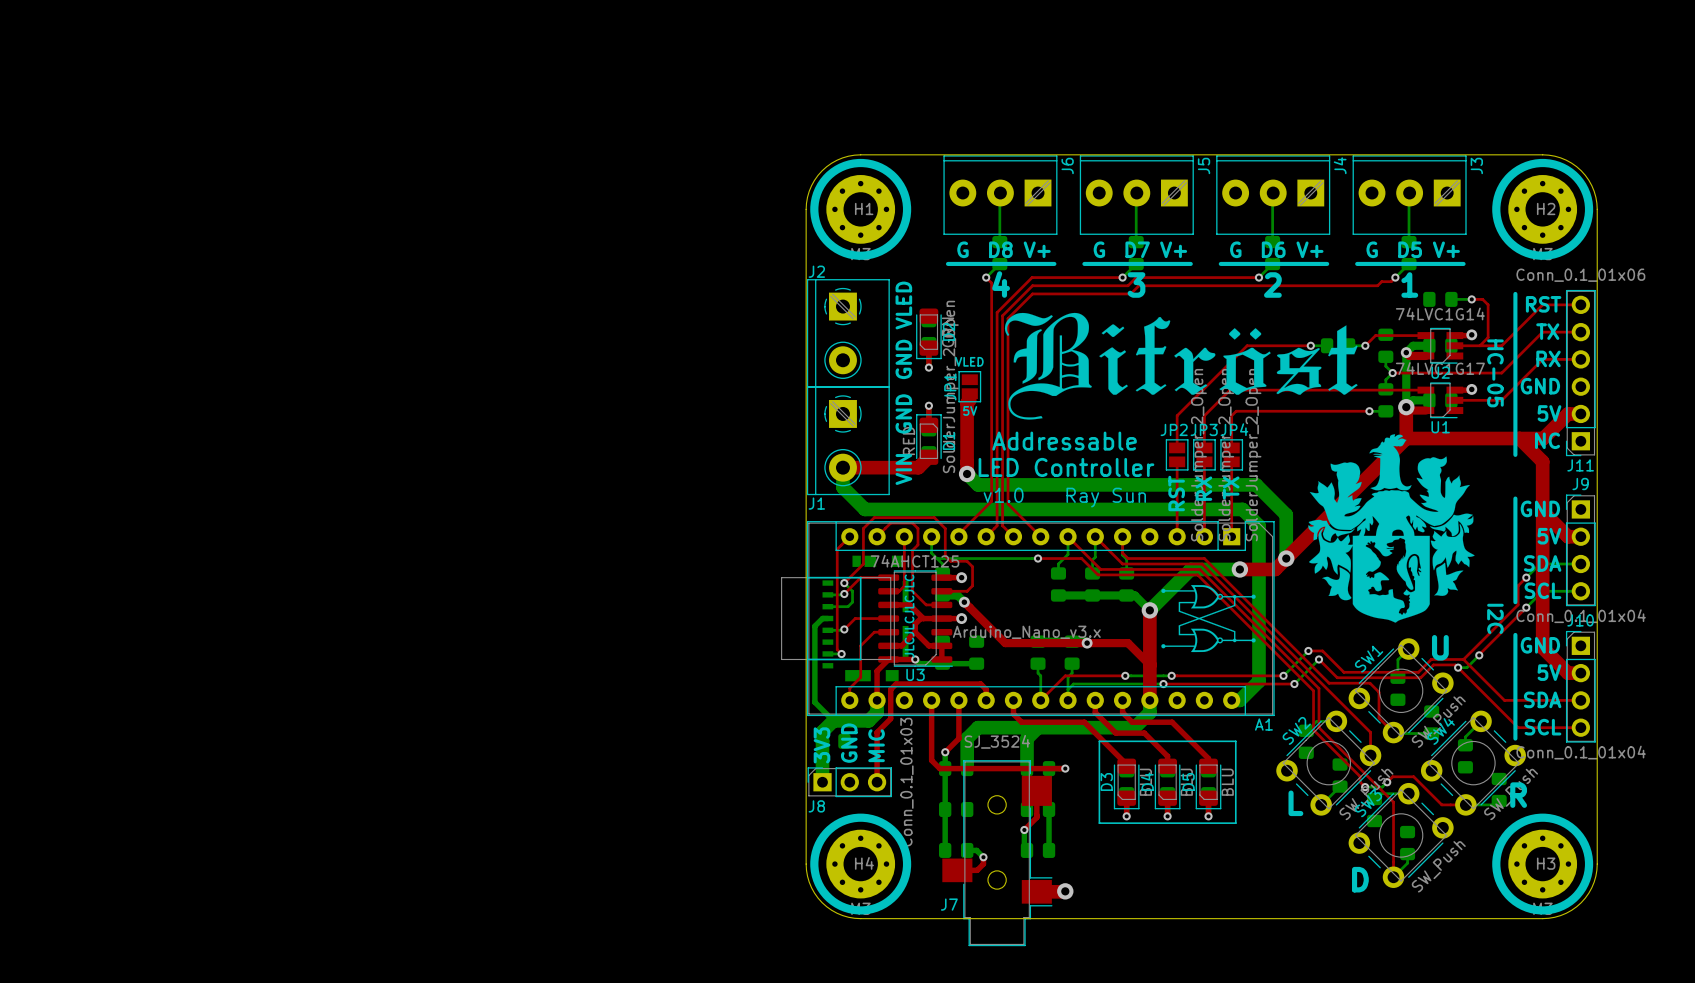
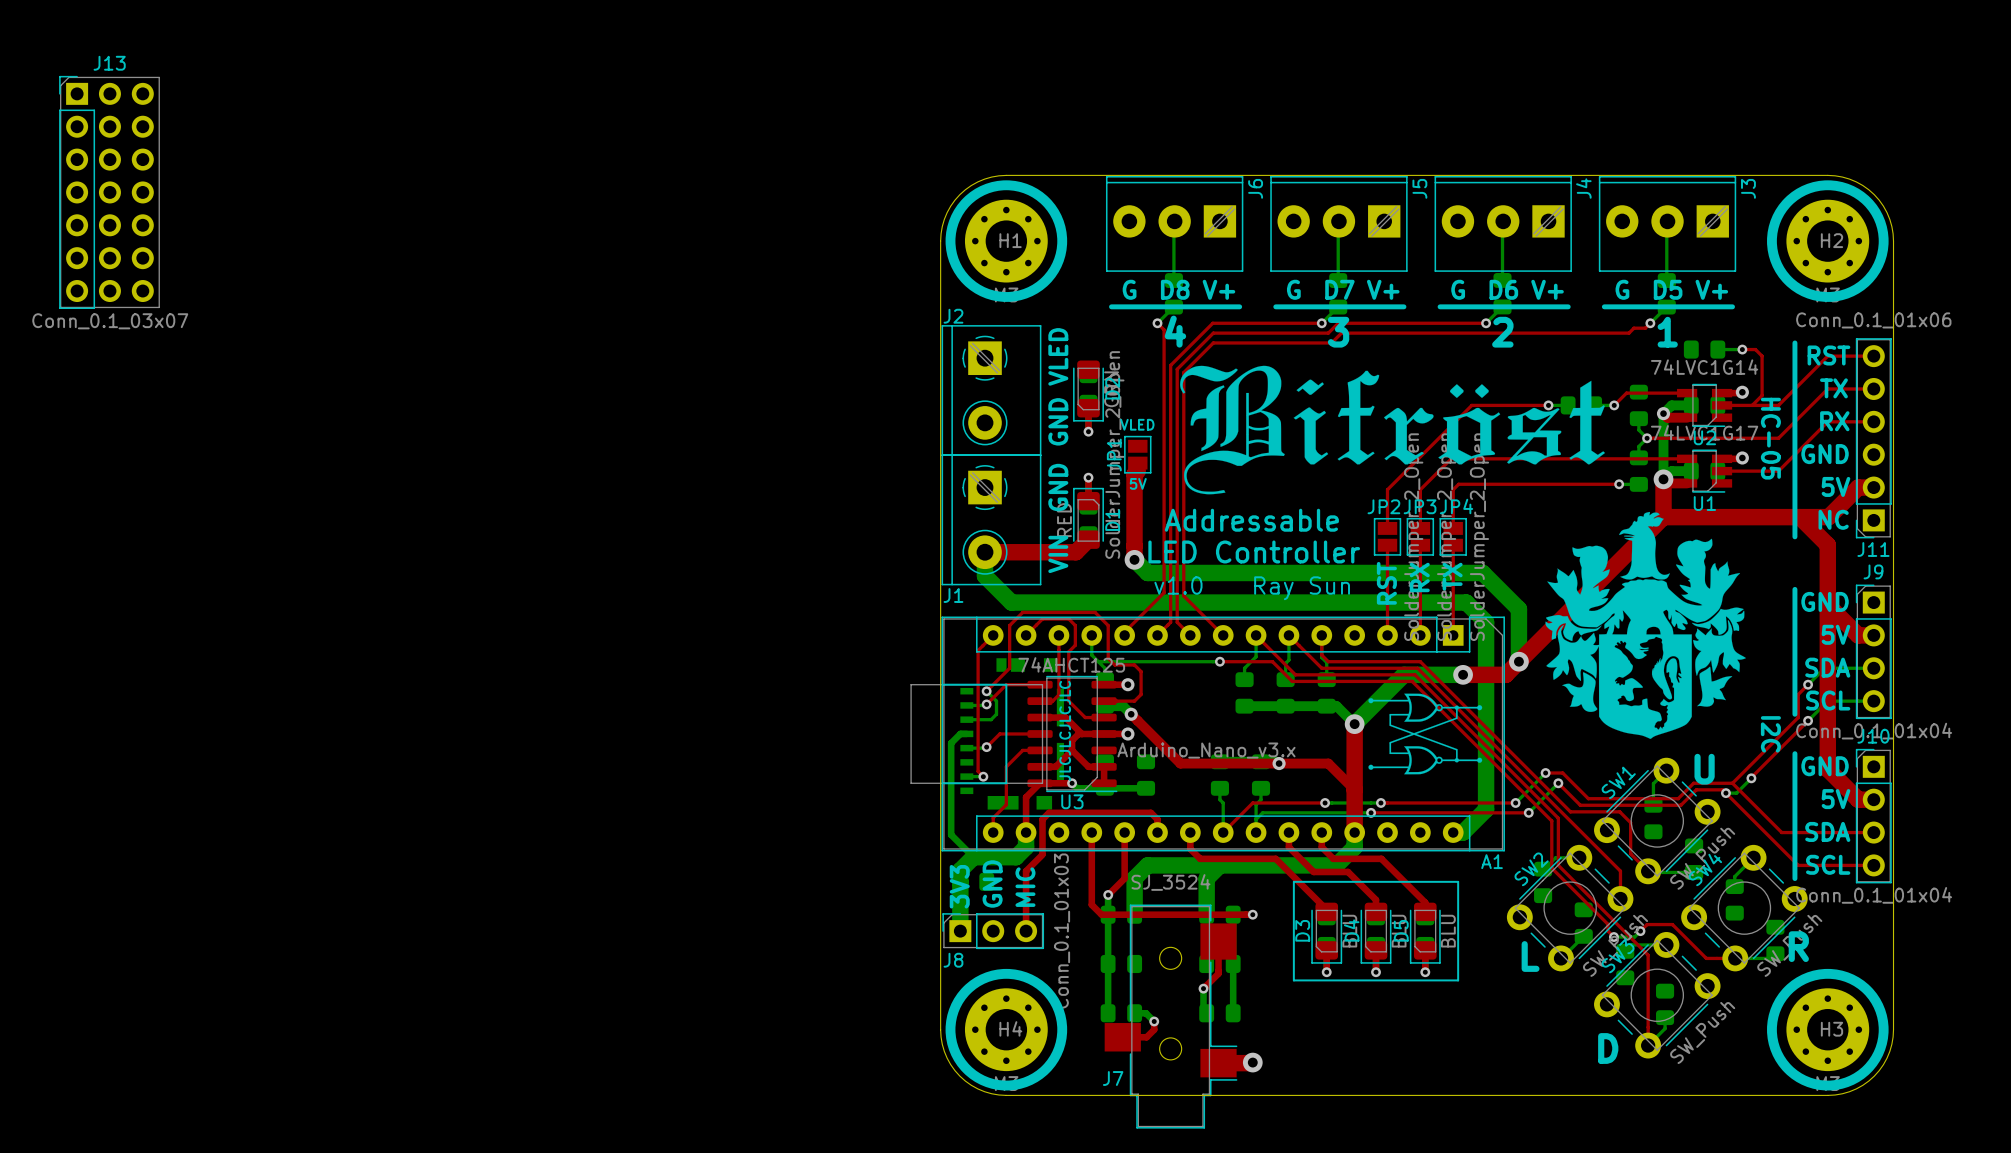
J13: none -> Conn_0.1_03x07 (109, 192)

